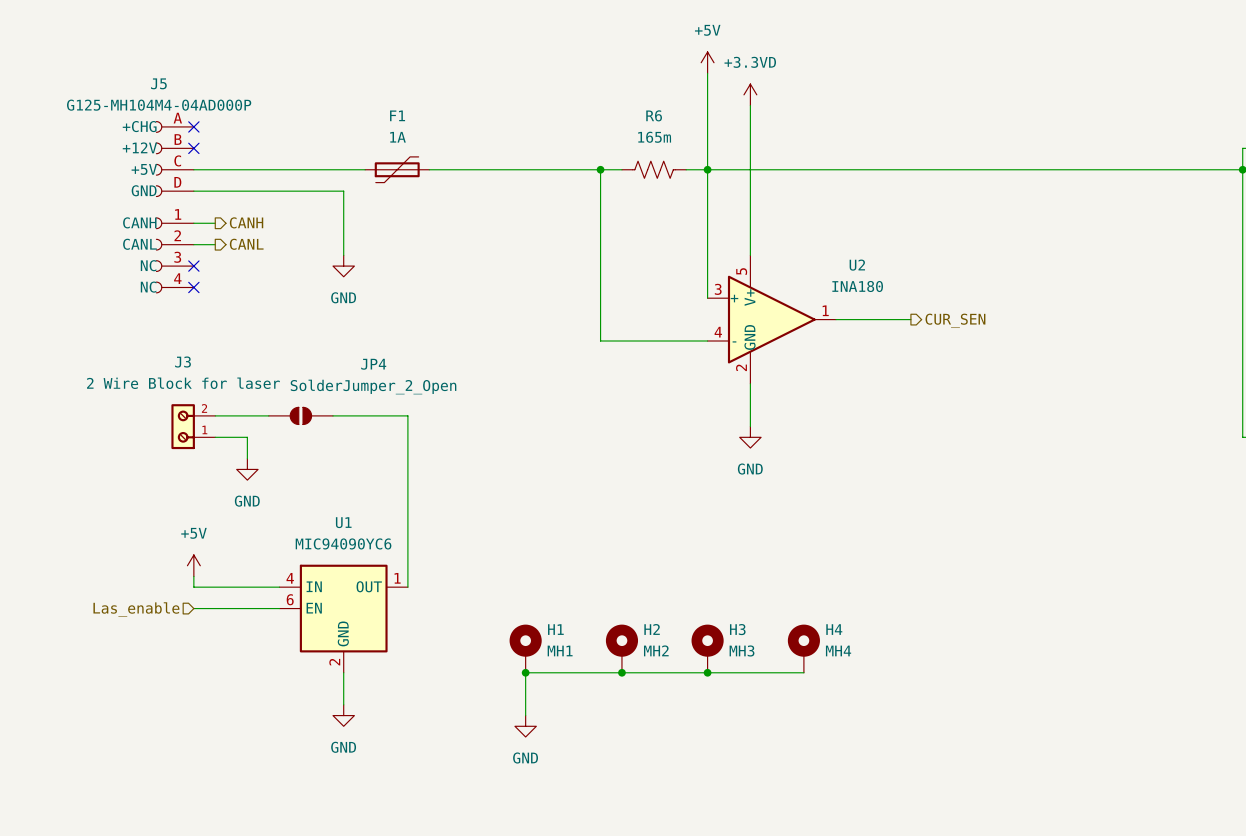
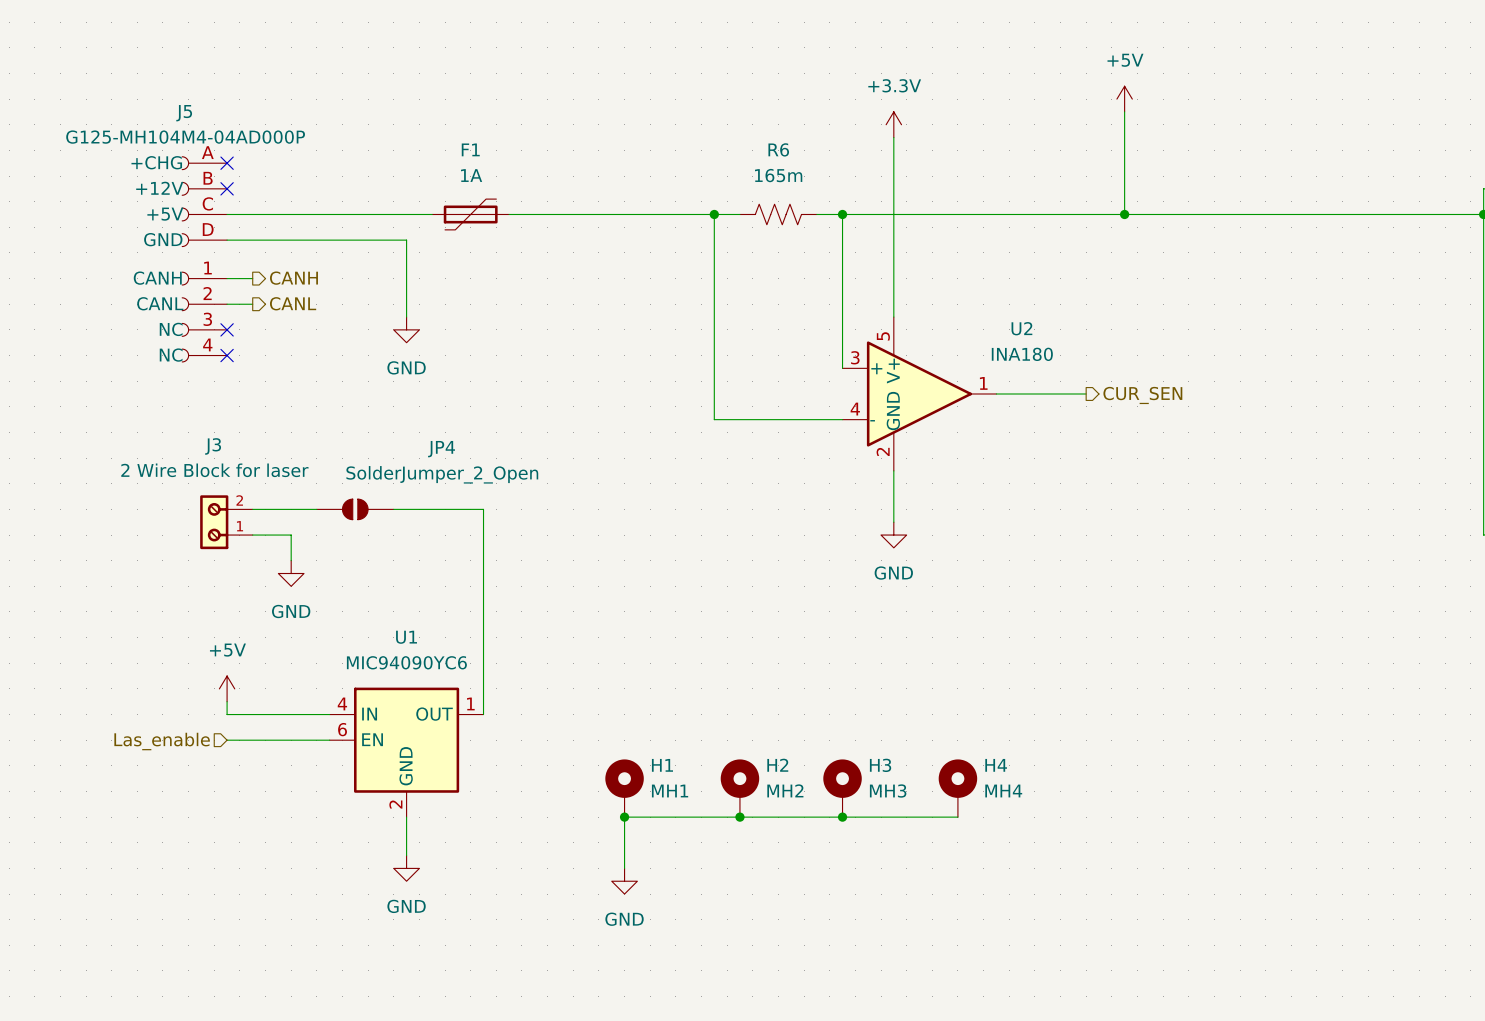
power symbol: +5V (707, 62) -> none
wire: (707, 73) (707, 169) -> none
power symbol: none -> +5V (1124, 99)
wire: none -> (1124, 111) (1124, 214)
power symbol: +3.3VD (750, 94) -> +3.3V (893, 124)
junction: none -> (1124, 214)

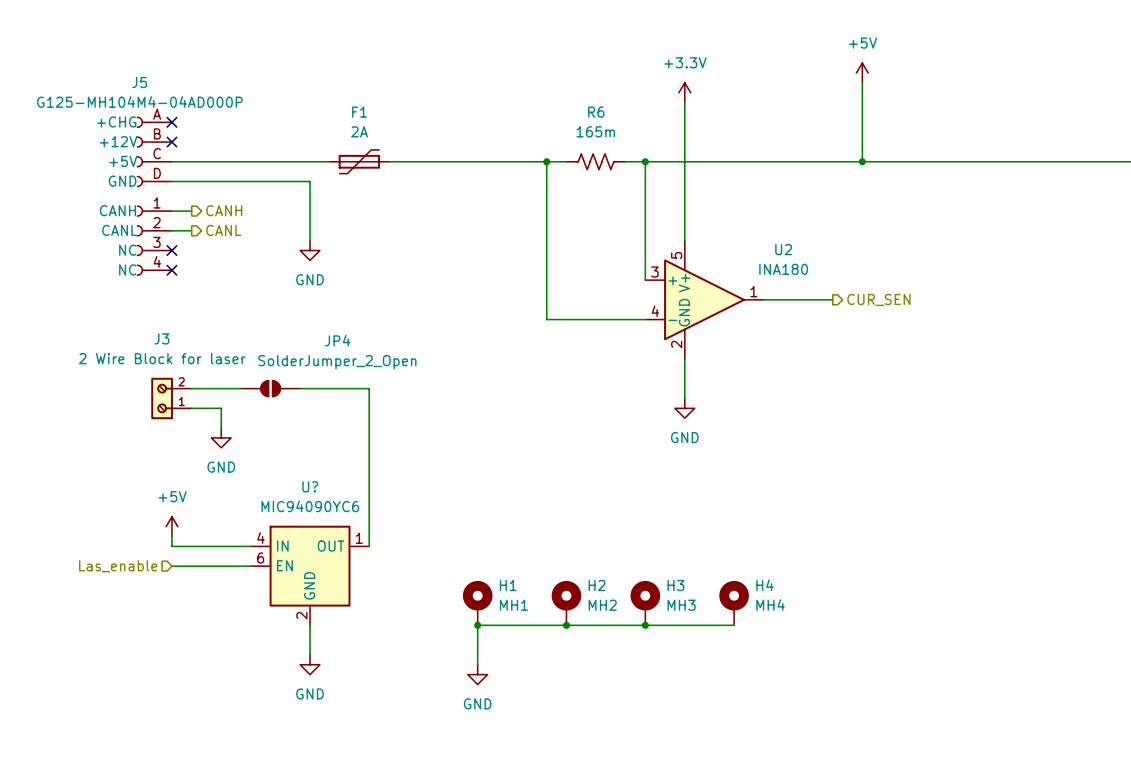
F1 value: 1A (471, 175) -> 2A (359, 131)
U1 name: U1 (406, 637) -> U? (310, 486)

